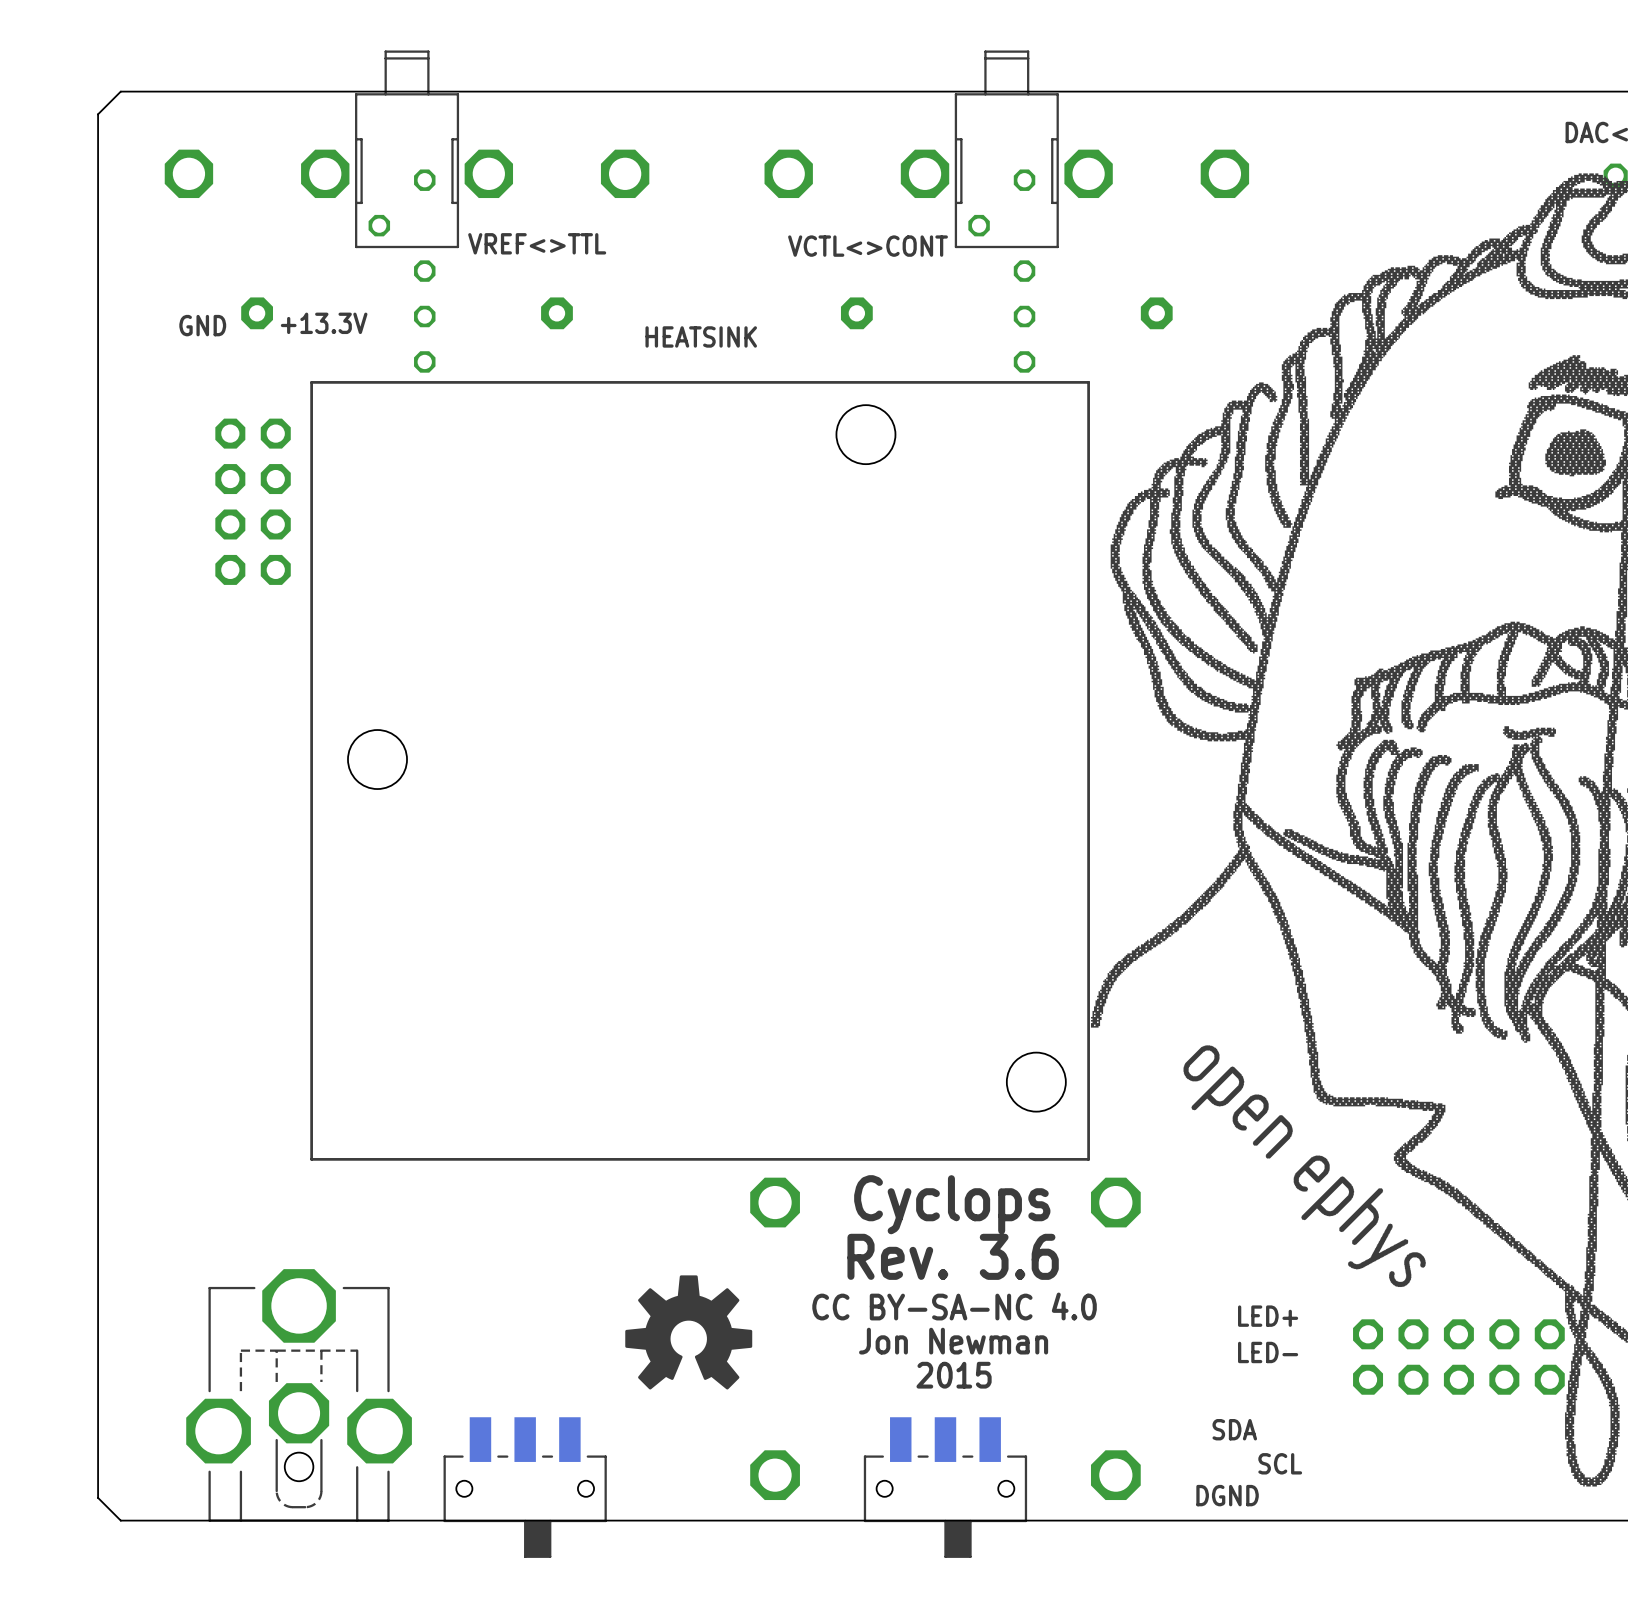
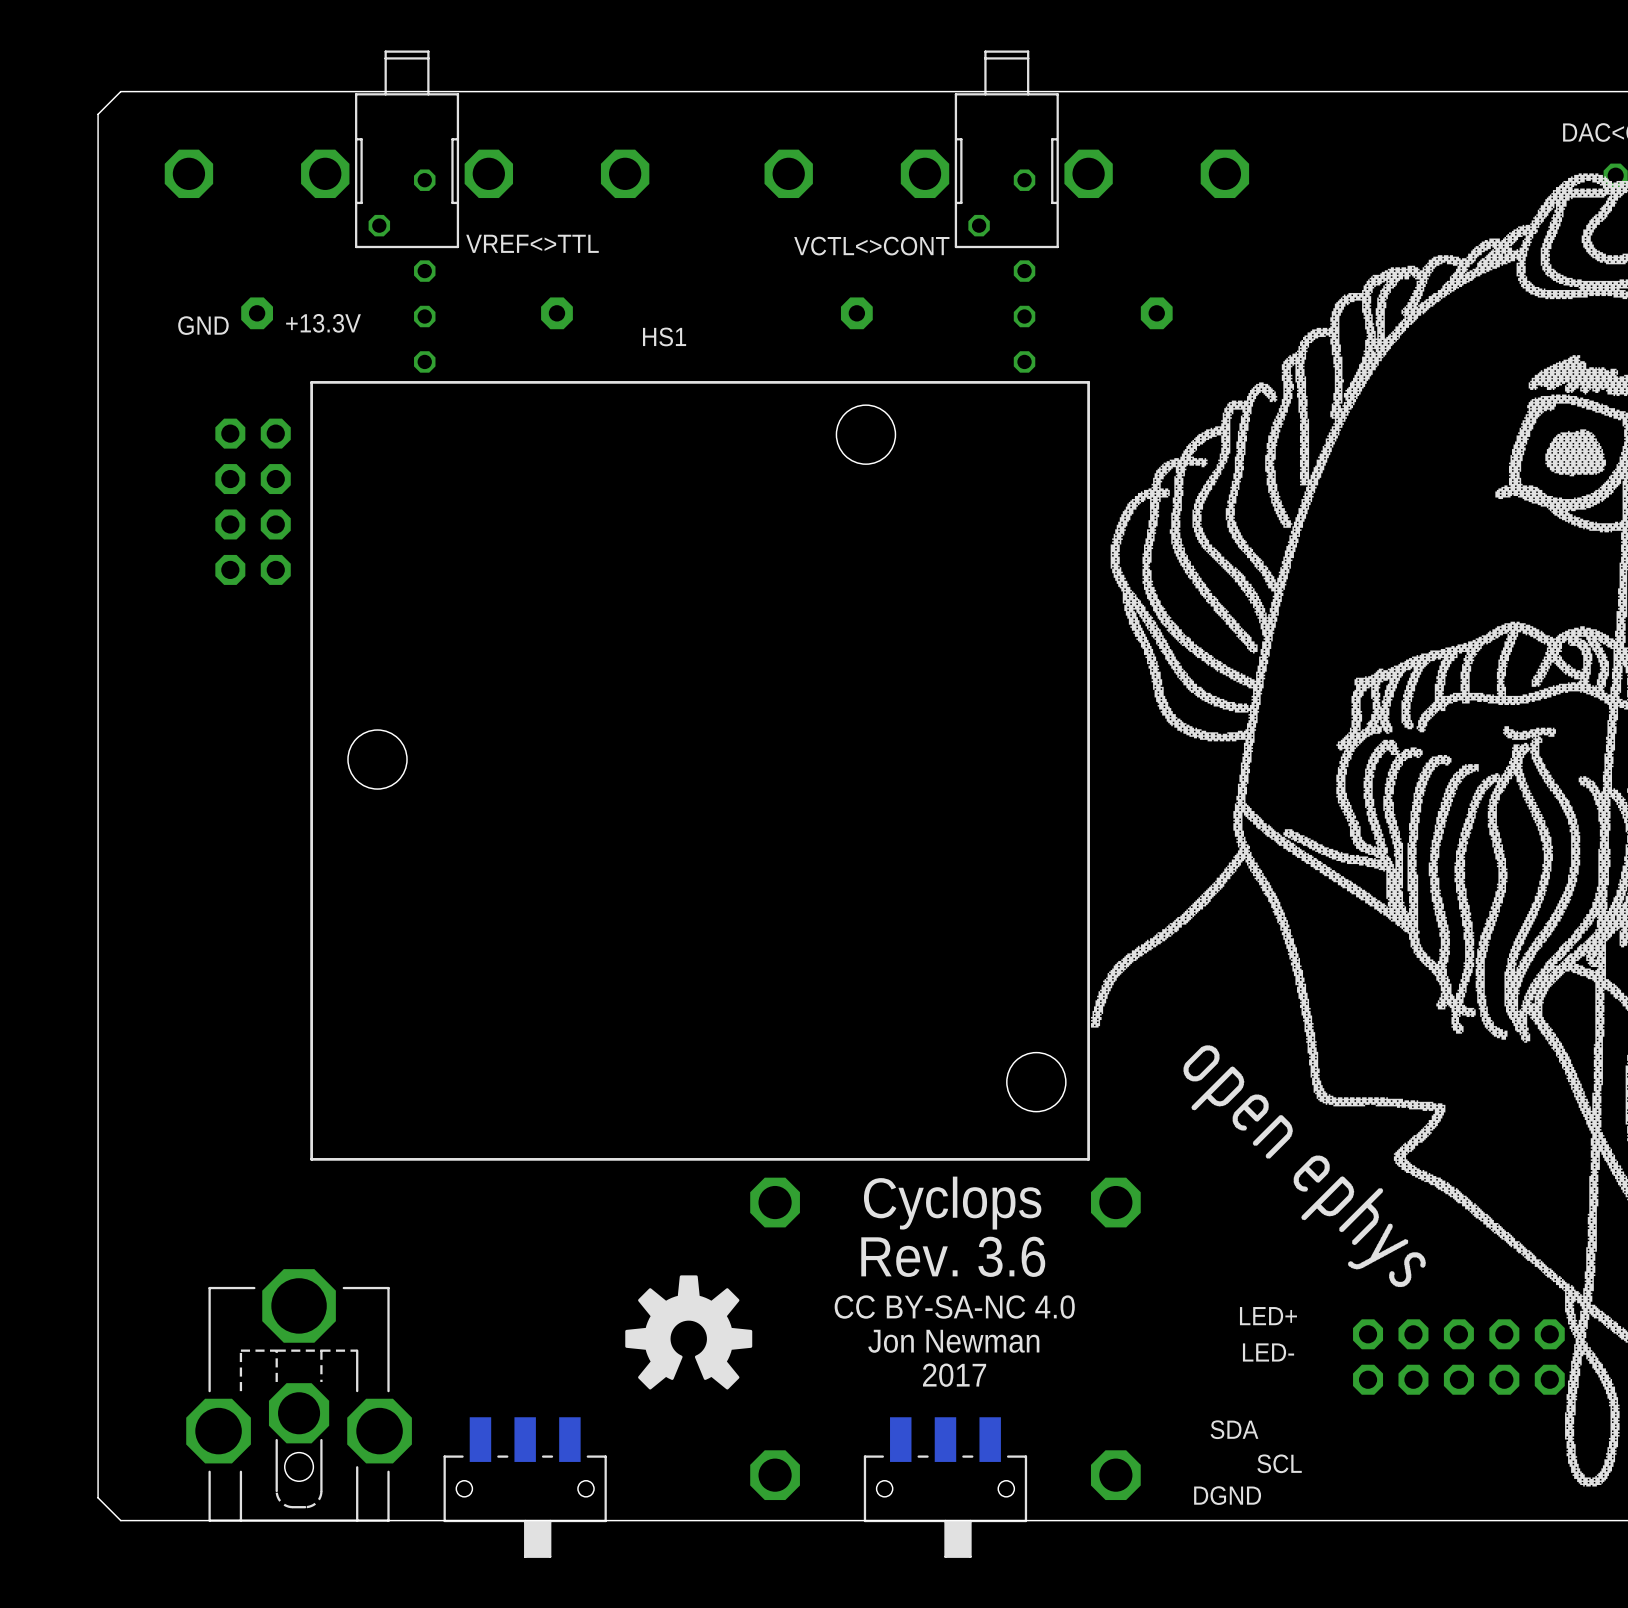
HEATSINK name: HEATSINK (701, 336) -> HS1 (664, 336)
text: 2015 (954, 1375) -> 2017 (954, 1375)

